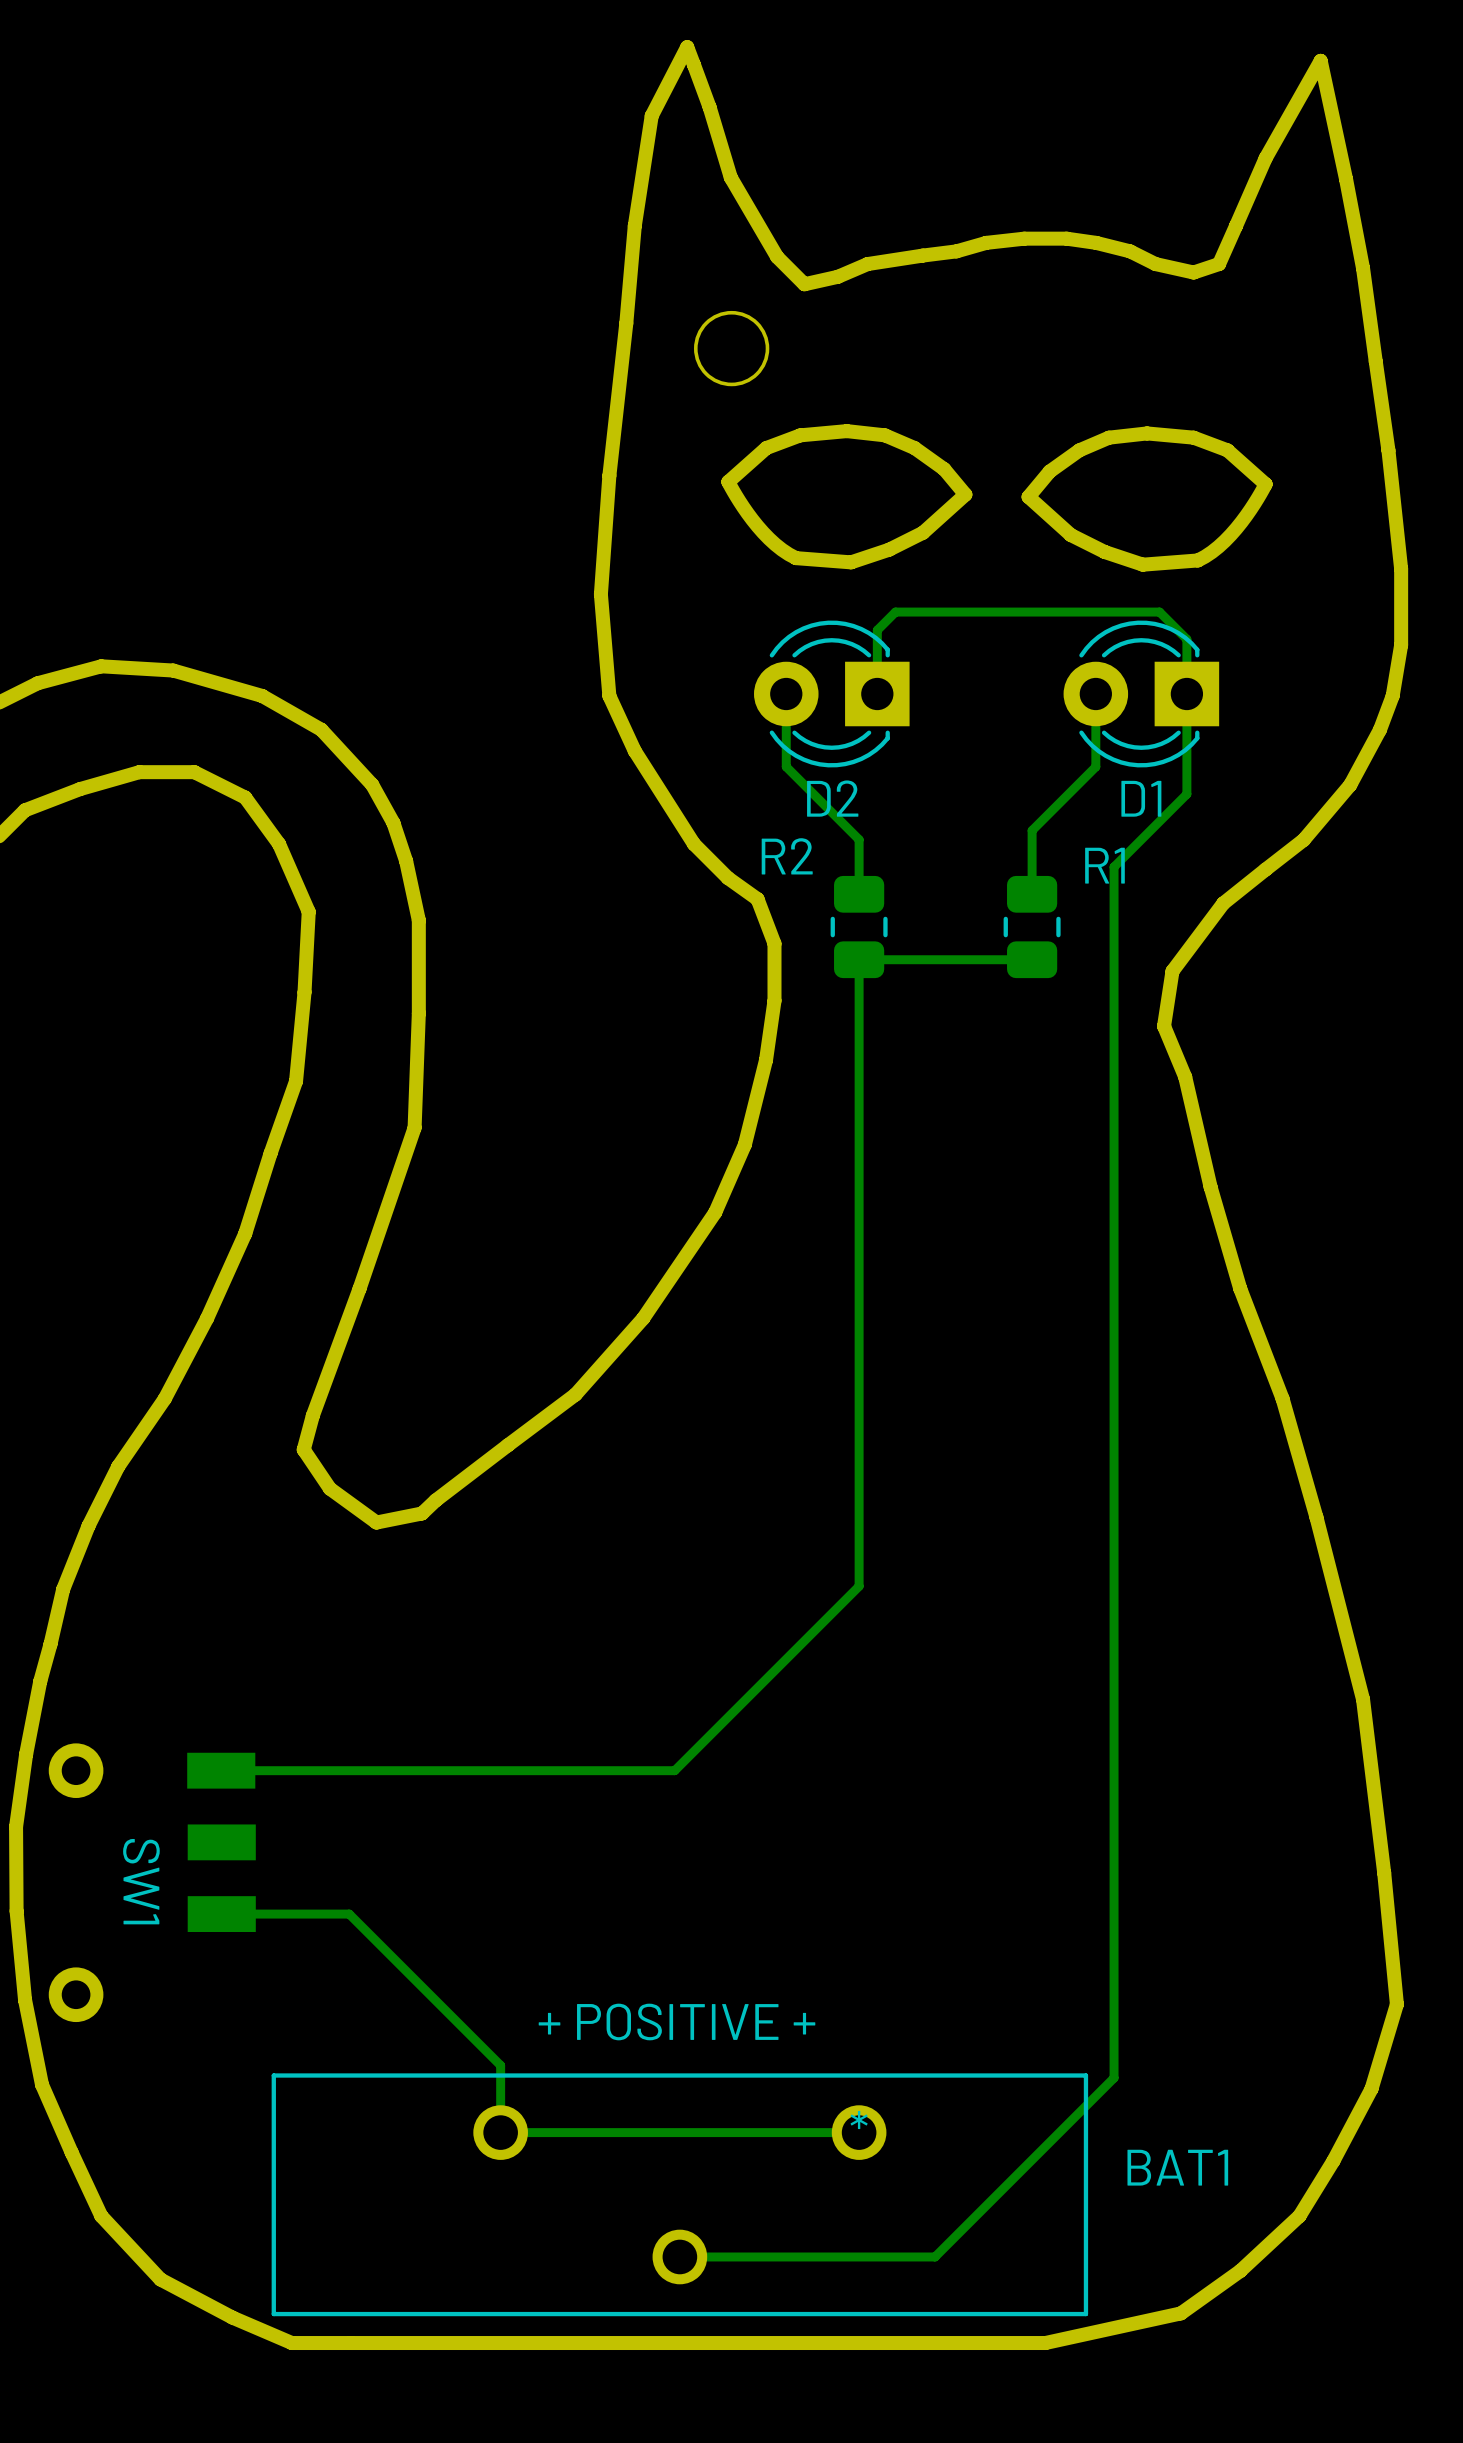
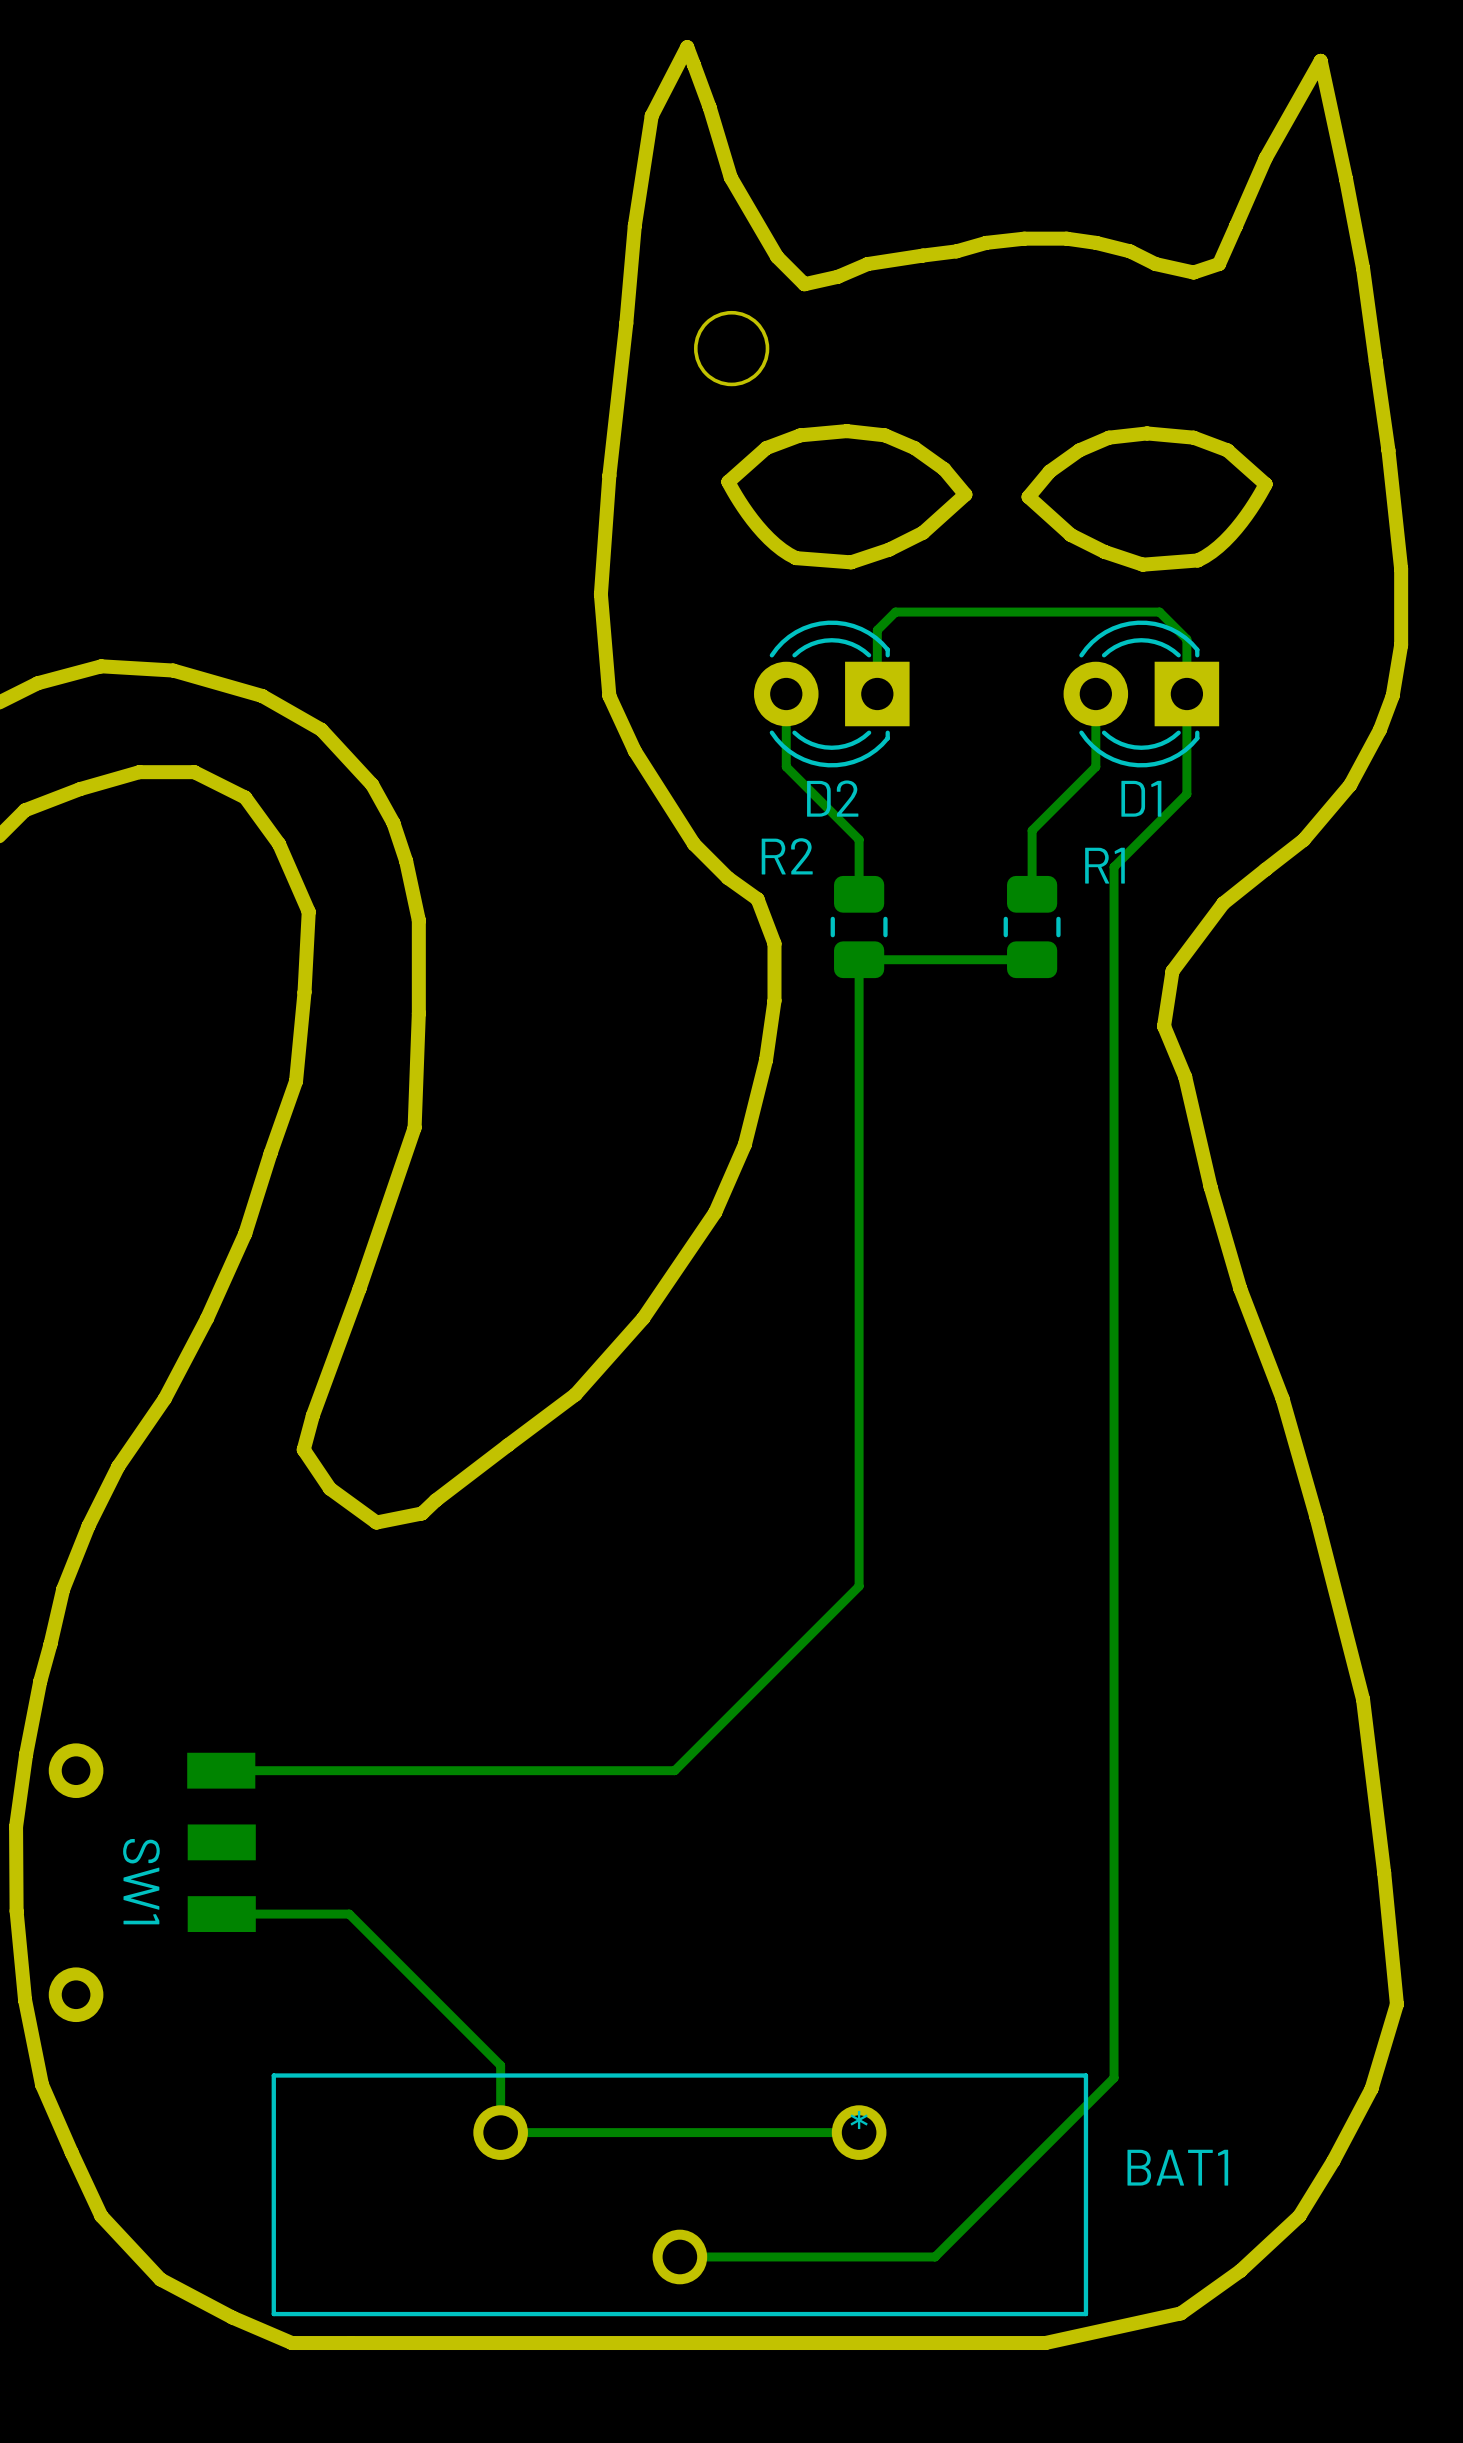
text: + POSITIVE + (677, 2021) -> none

